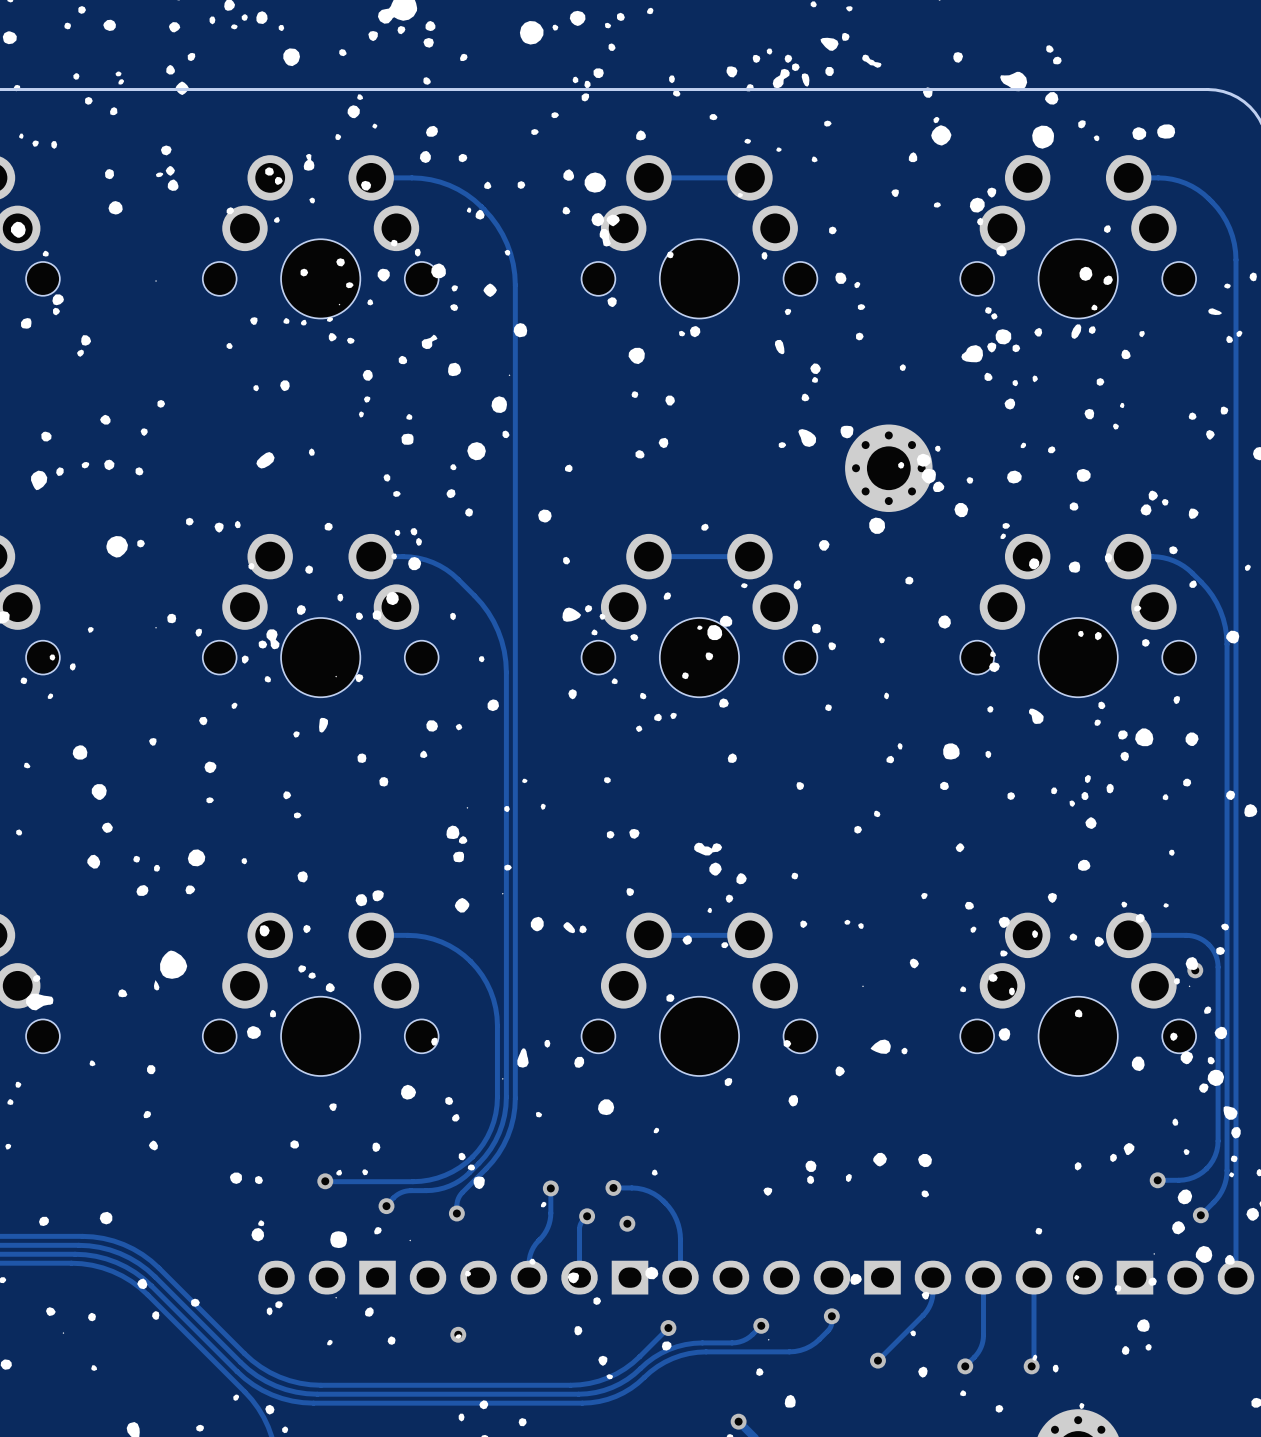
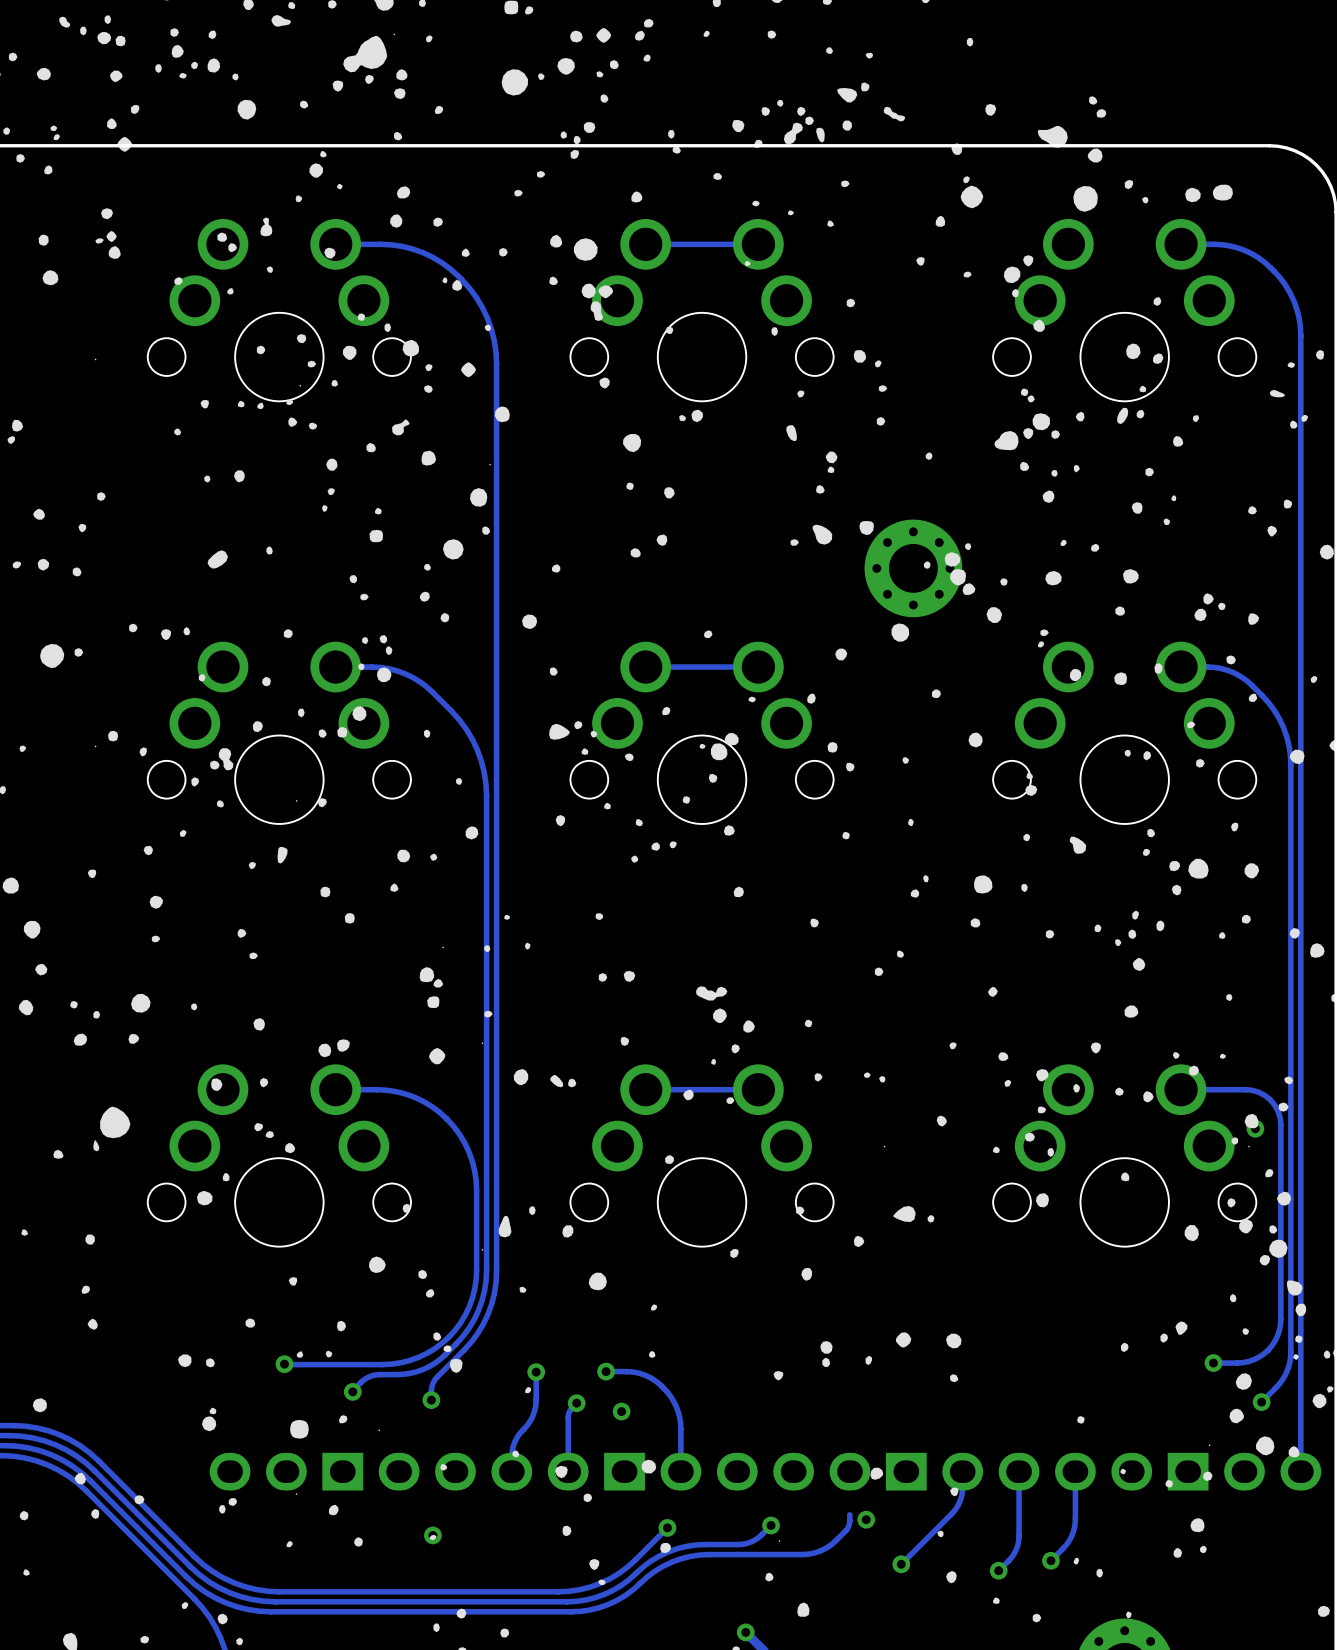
via position: (831, 1316) -> (866, 1519)
track: (1033, 1320) (1033, 1362) (1031, 1366) -> (1075, 1518) (1070, 1538) (1050, 1560)
via position: (1031, 1366) -> (1050, 1560)

